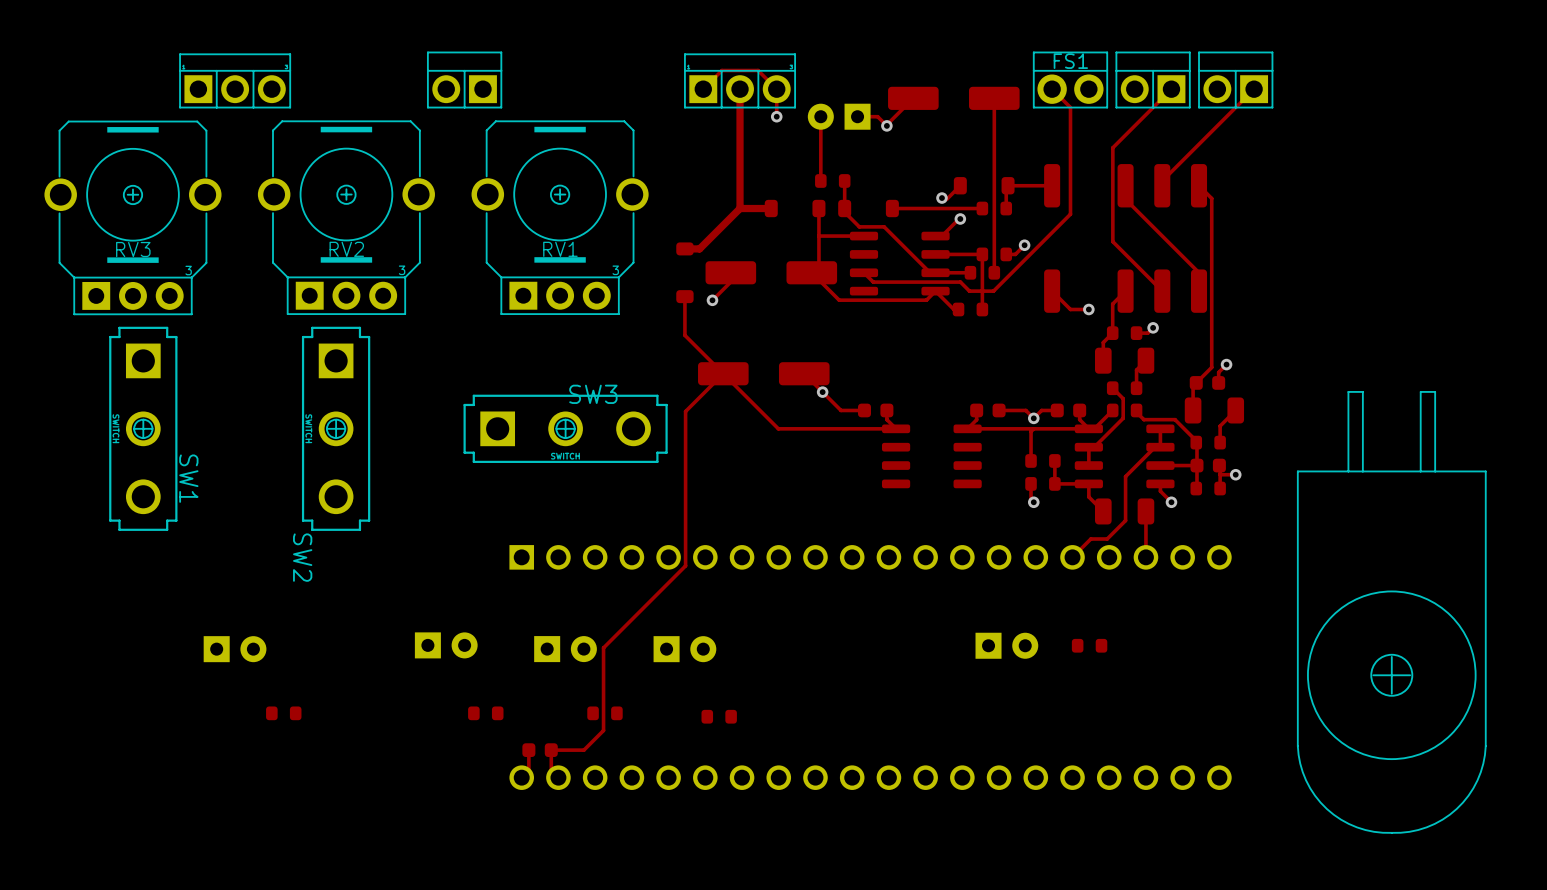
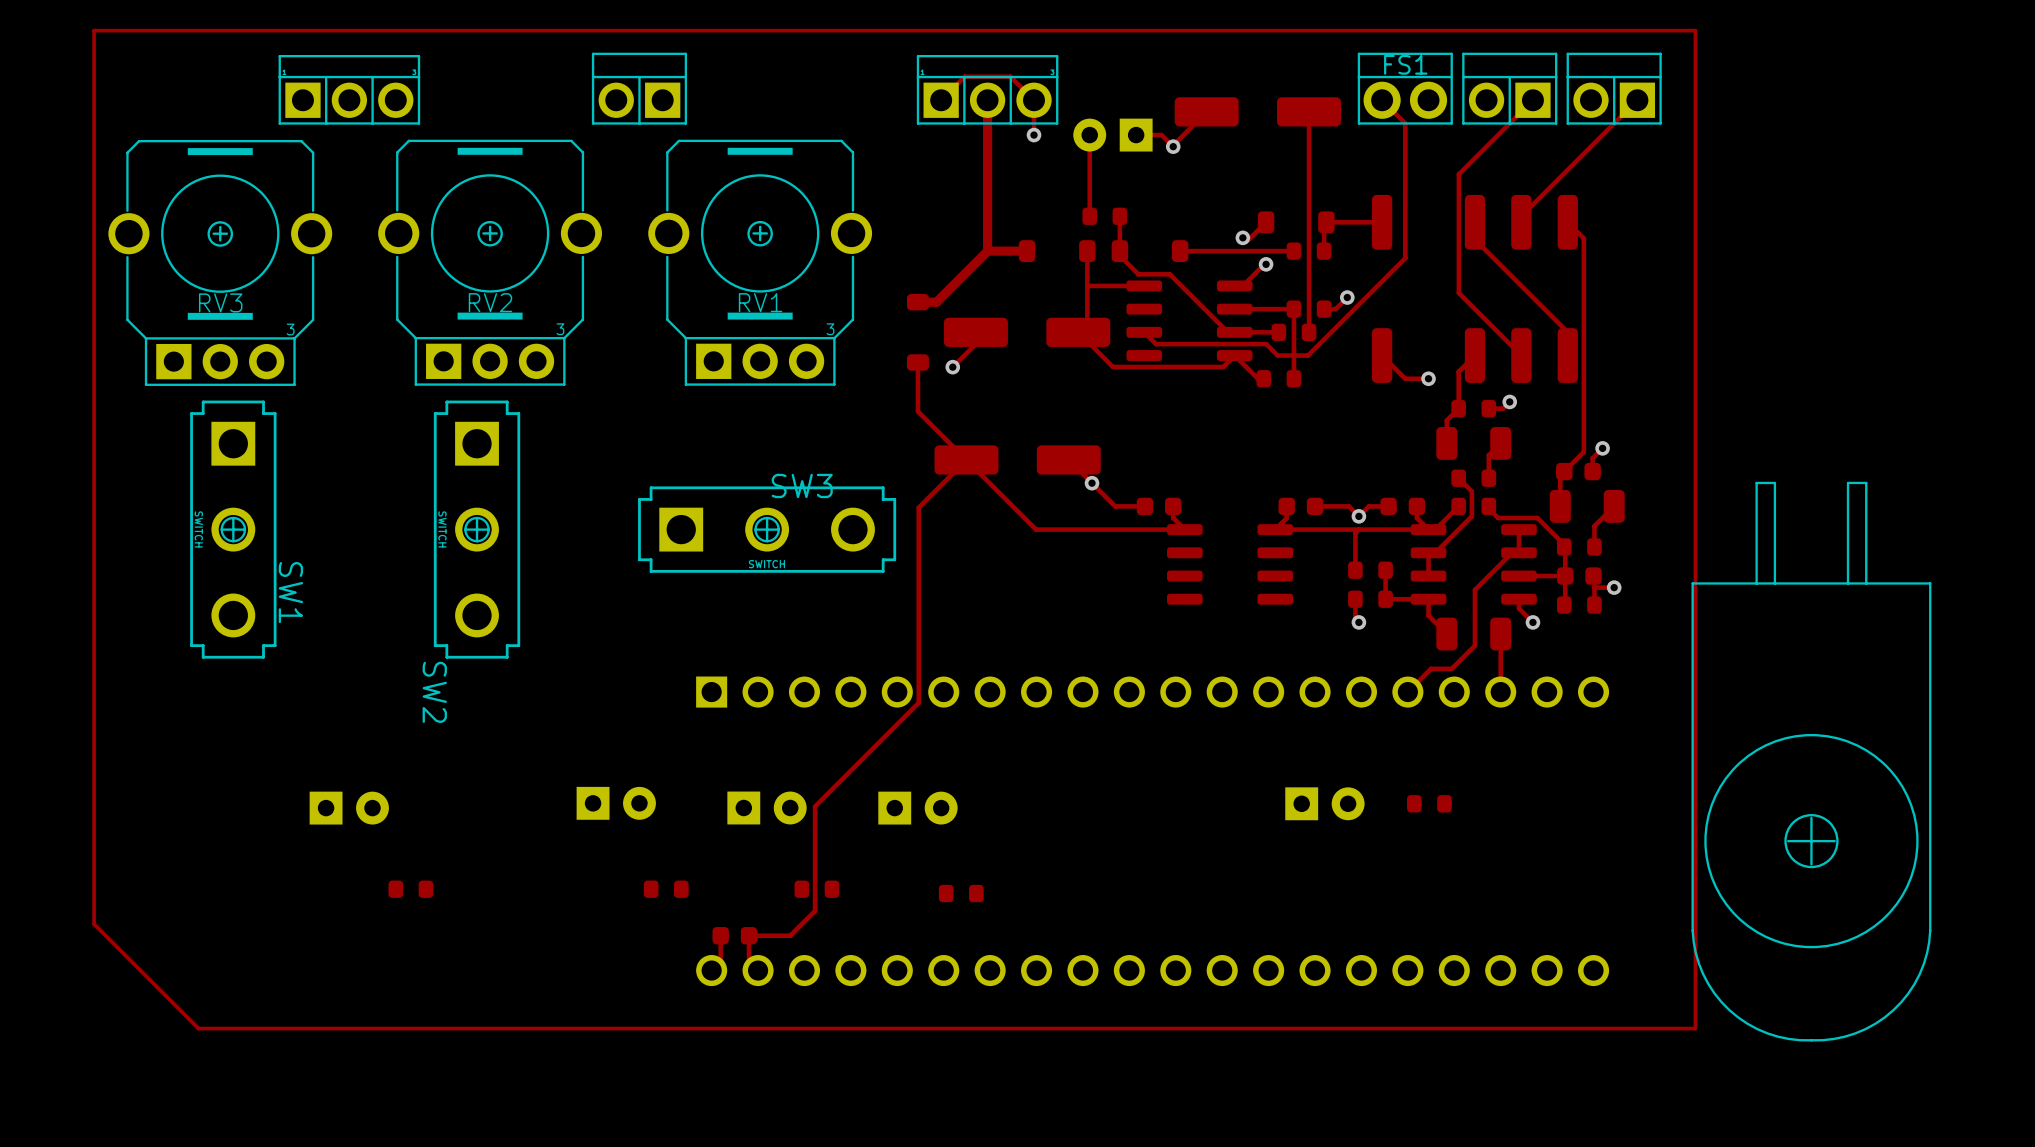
top track: none -> (1695, 30) (1695, 1028) (198, 1028) (94, 924) (94, 30) (1695, 30)

